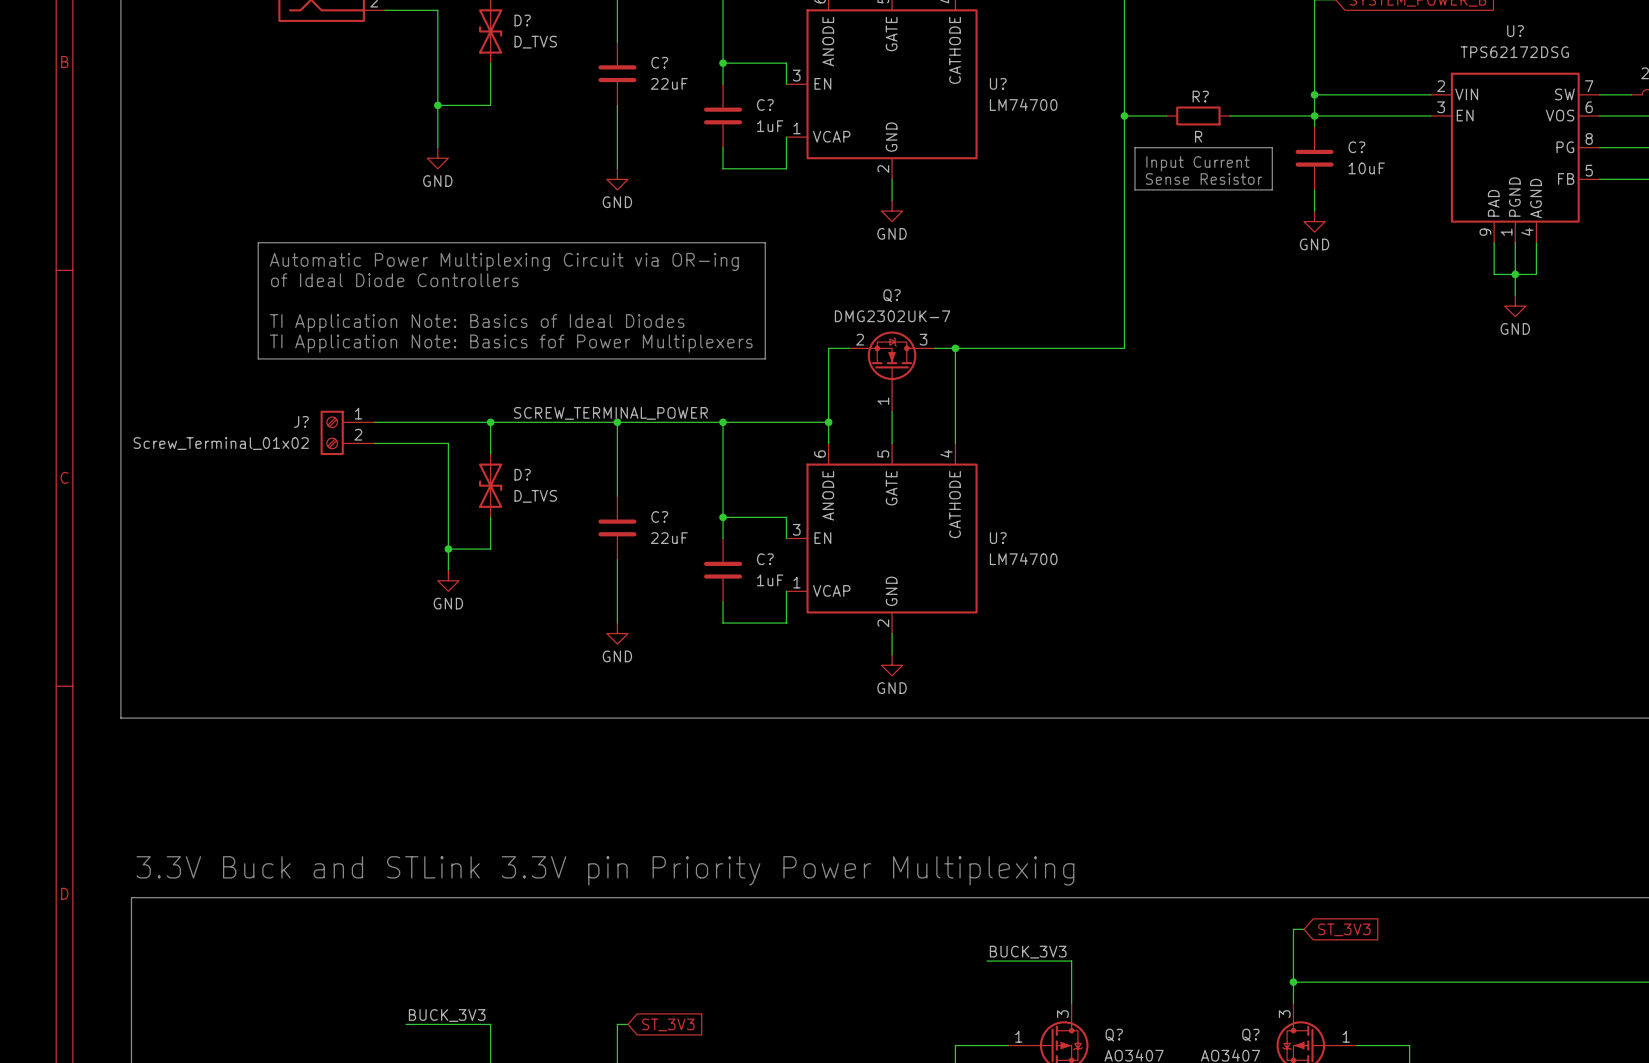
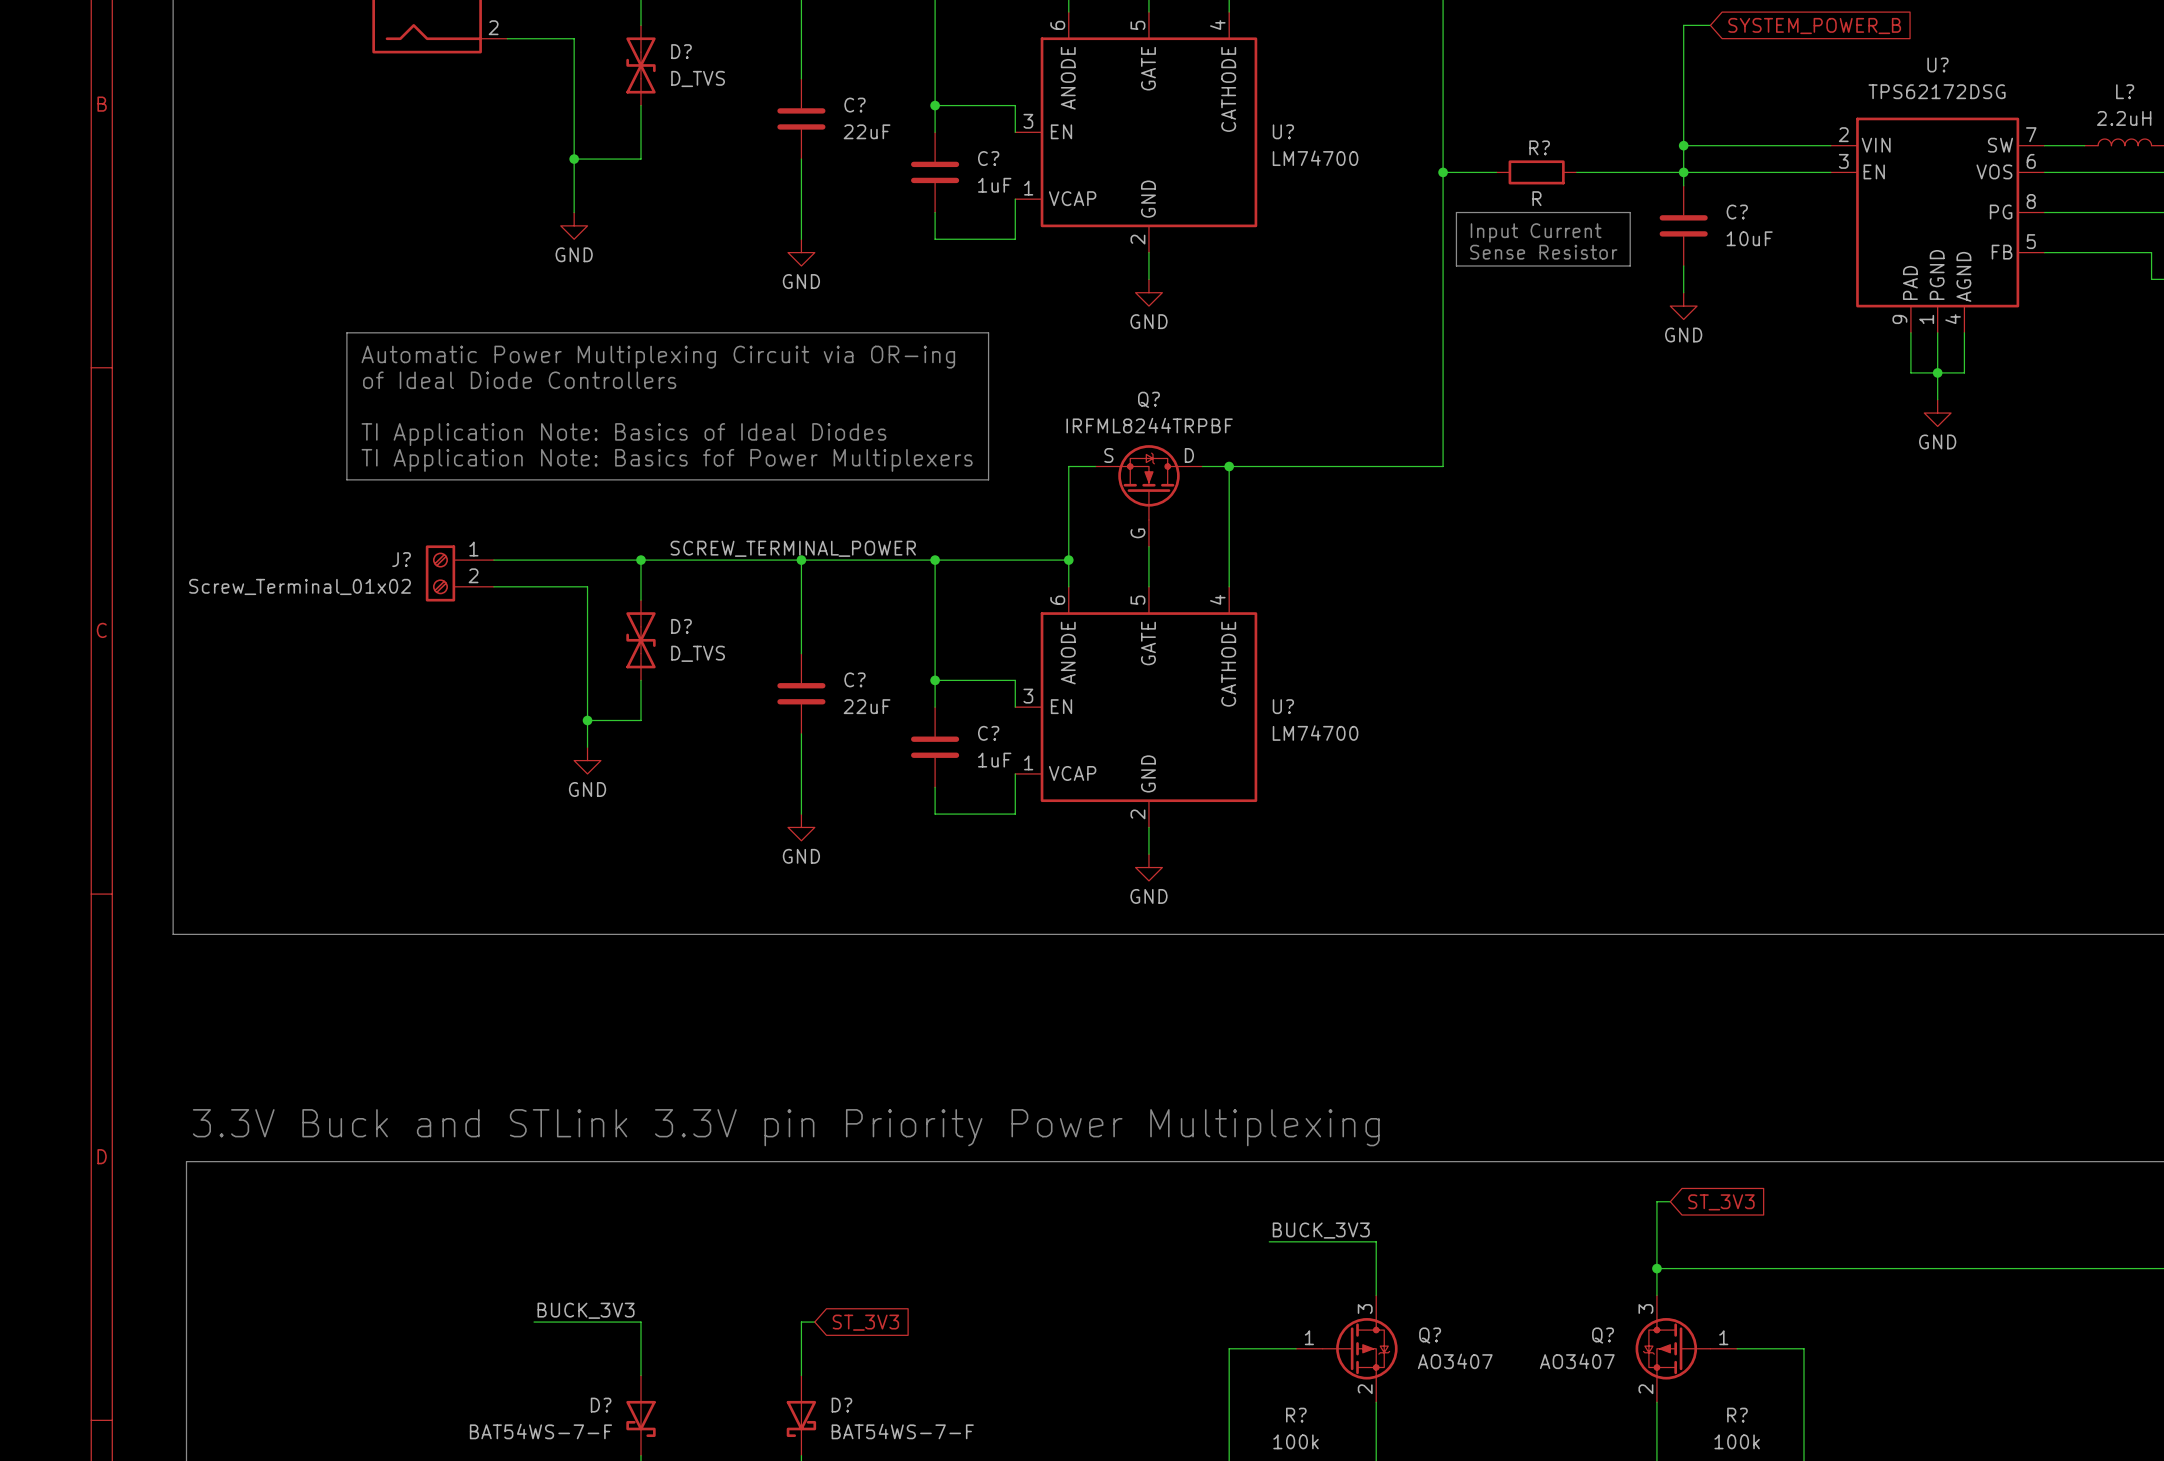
Q? value: DMG2302UK-7 (892, 316) -> IRFML8244TRPBF (1149, 425)
Q? pin name: none -> S (1108, 455)
Q? pin number: 2 (860, 339) -> none
Q? pin name: none -> D (1189, 455)
Q? pin number: 3 (923, 339) -> none
Q? pin name: none -> G (1137, 533)
Q? pin number: 1 (883, 401) -> none

